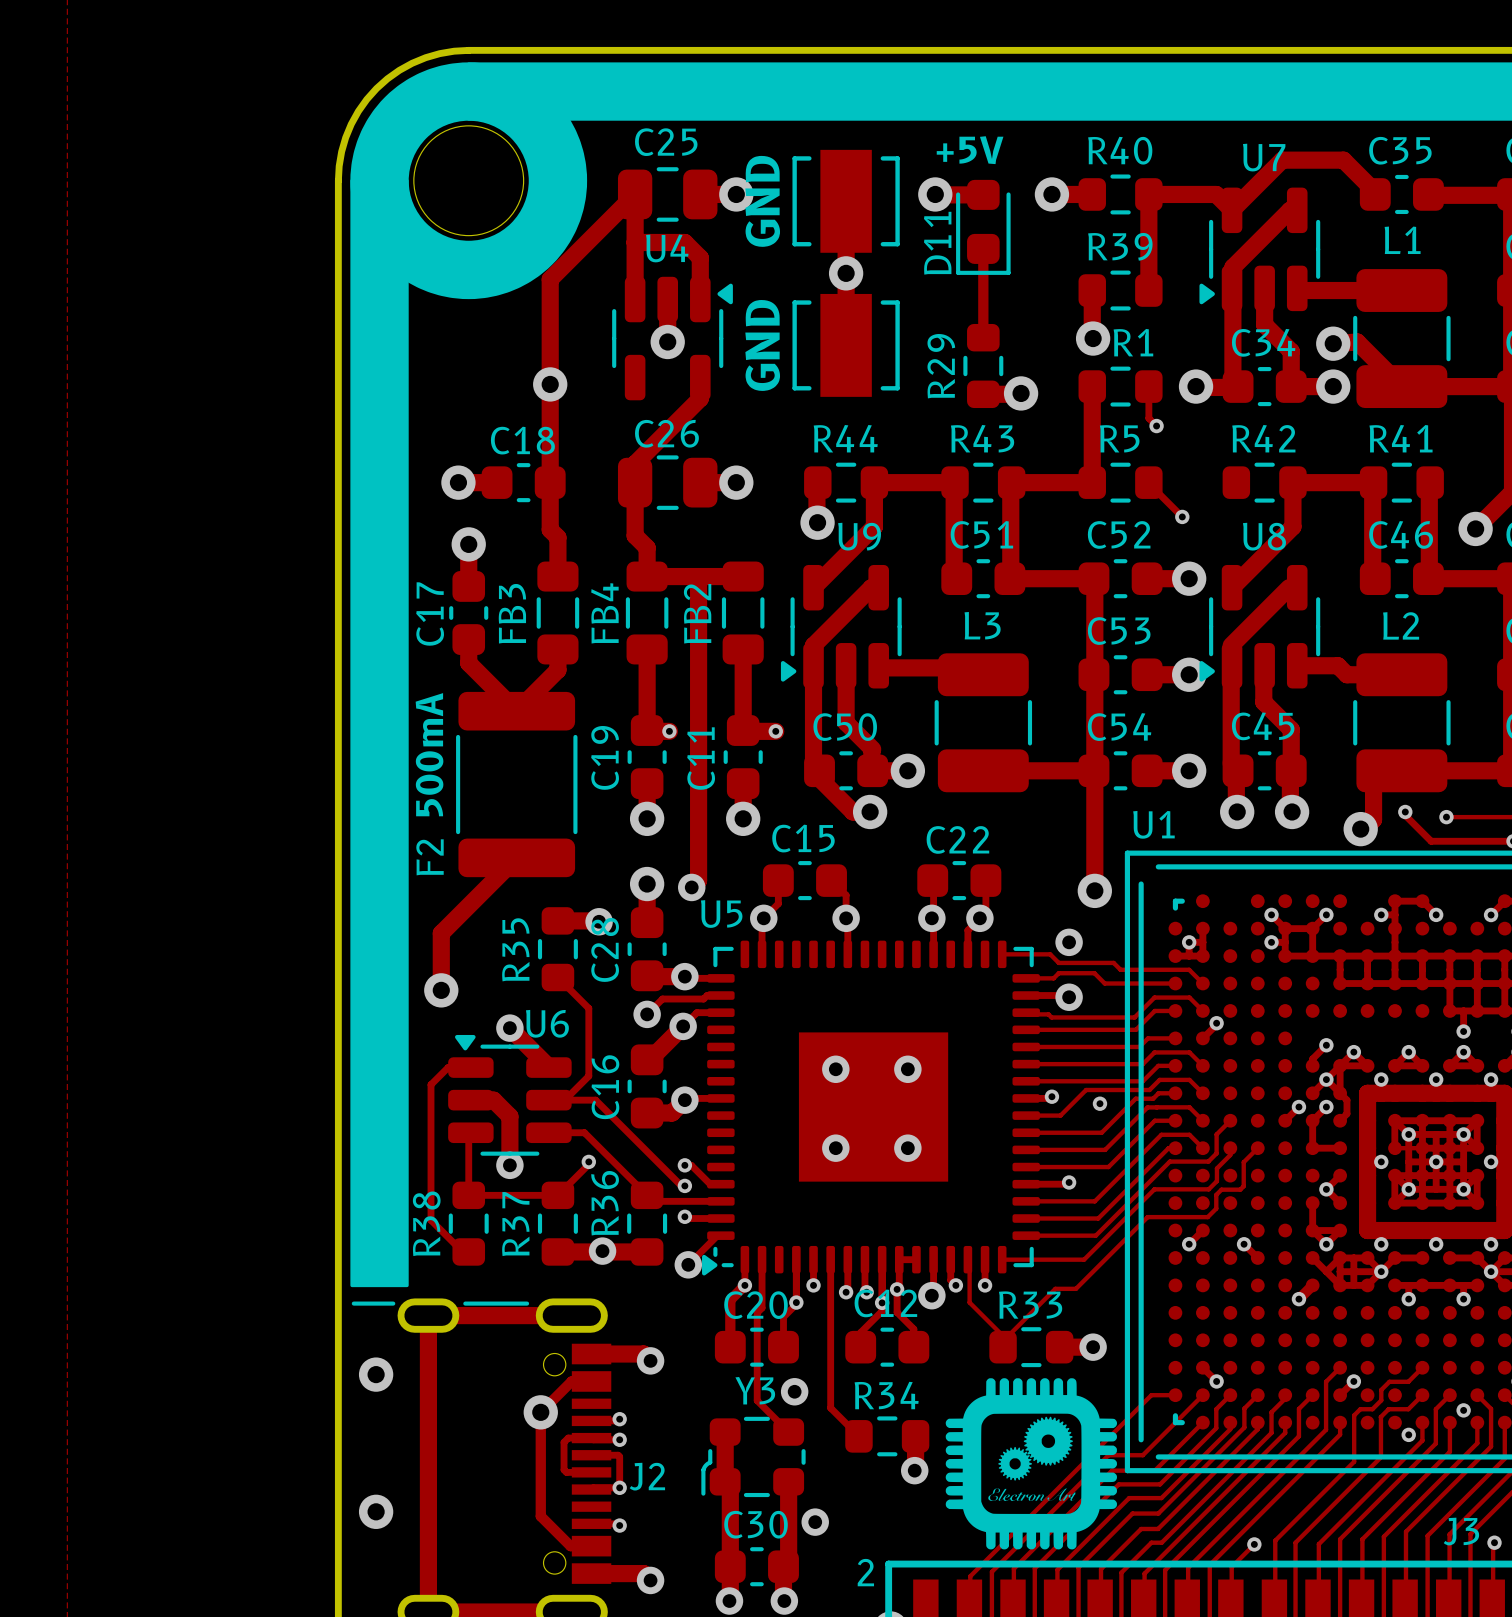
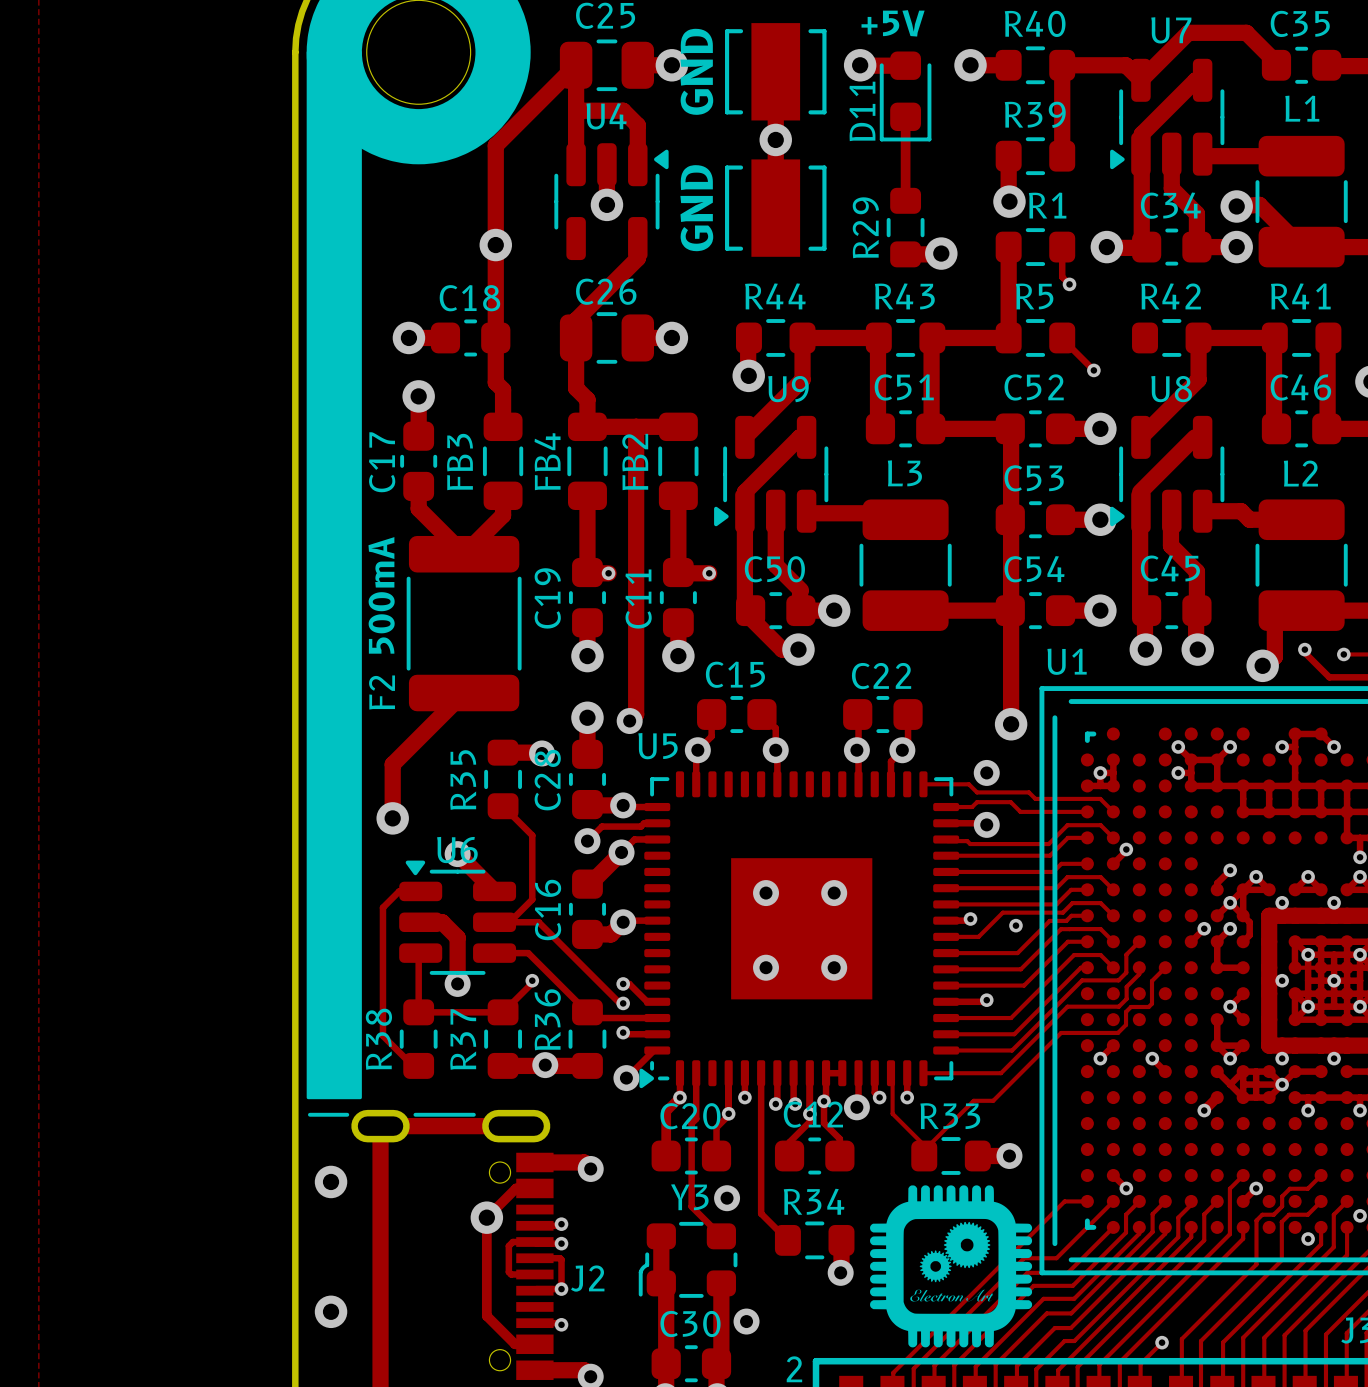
U6 name position: U6 (547, 1023) -> U6 (457, 850)

